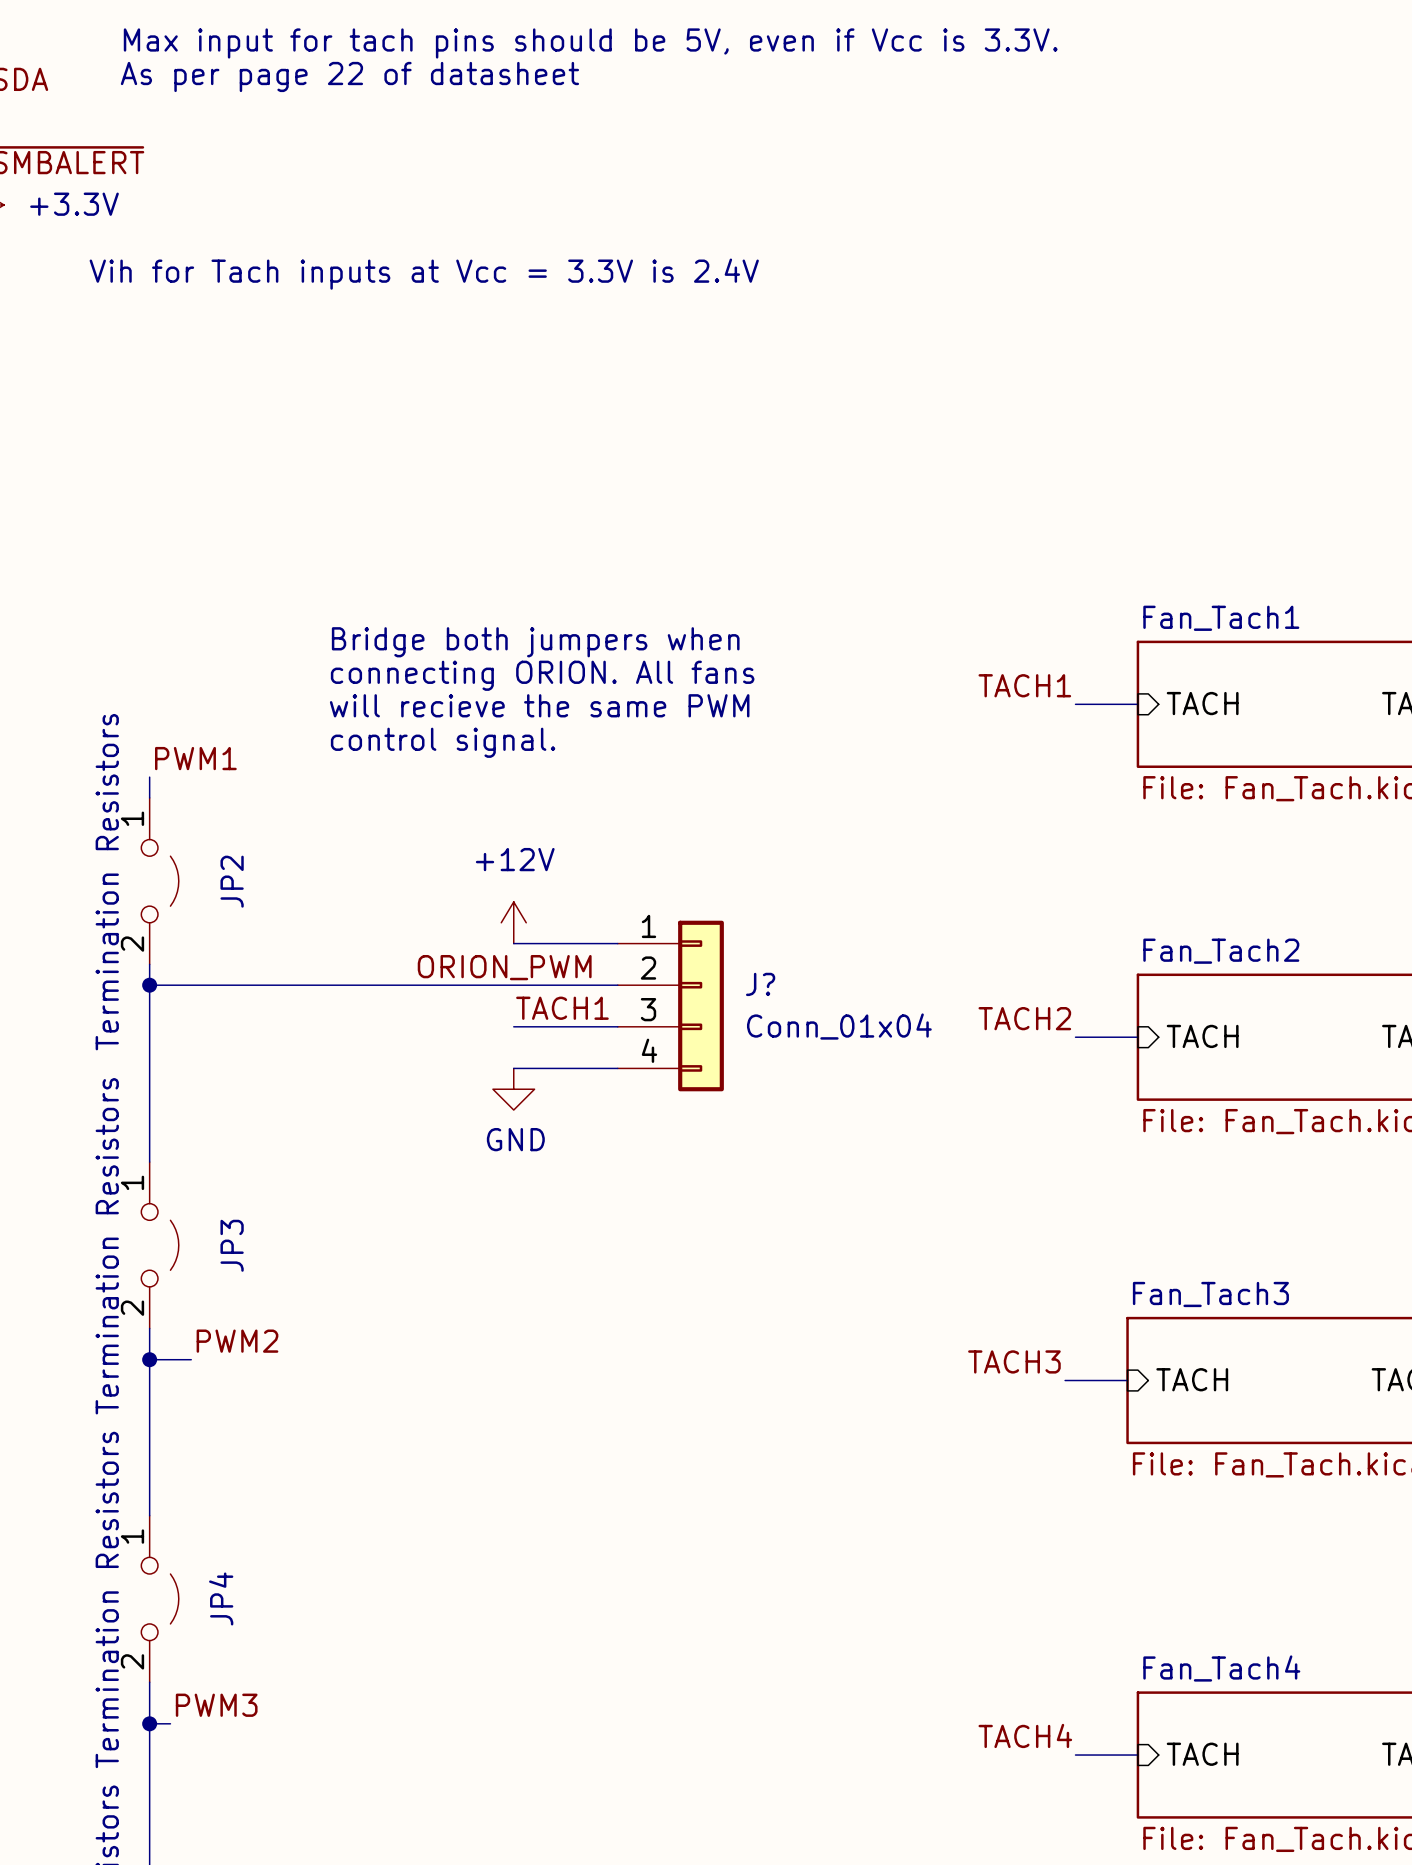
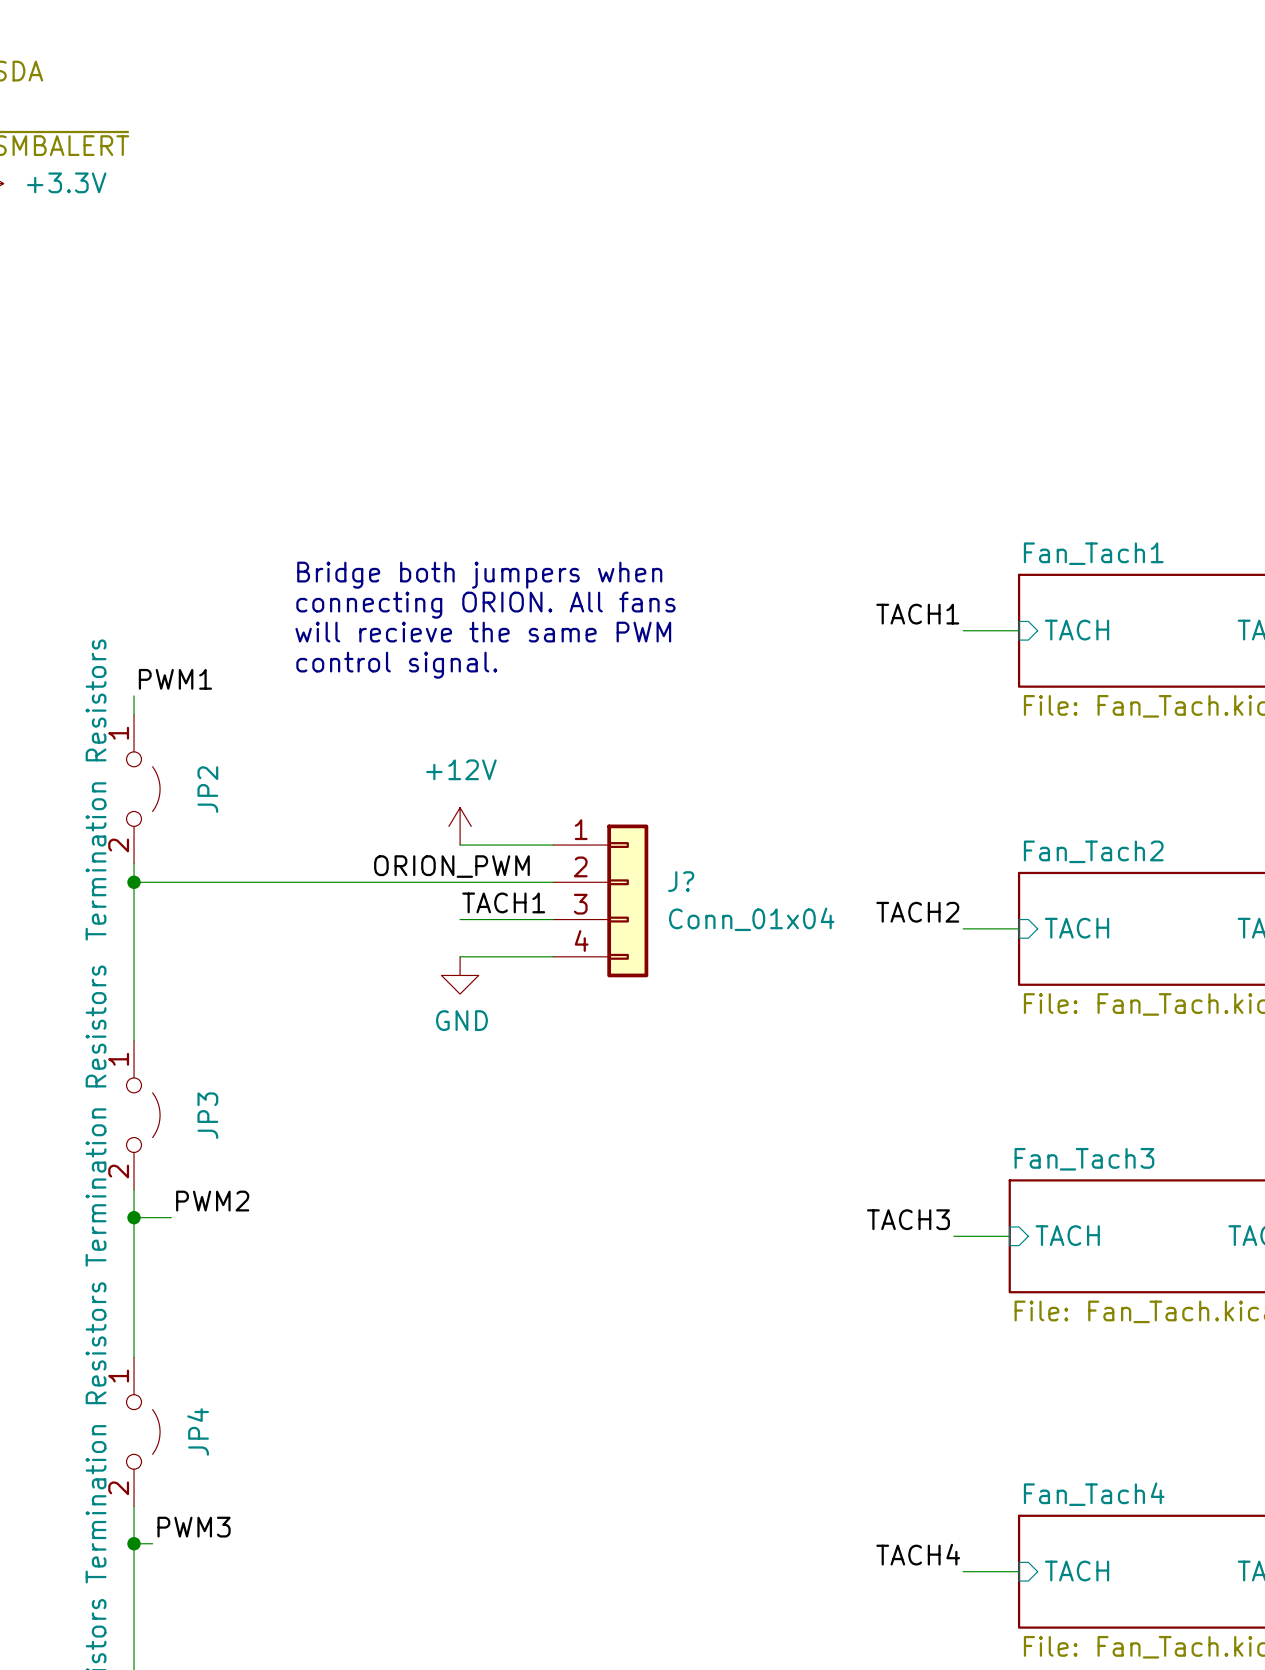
text: Max input for tach pins should be 5V, even if Vcc is 3.3V. (590, 43) -> none
text: As per page 22 of datasheet (349, 76) -> none
text: Vih for Tach inputs at Vcc = 3.3V is 2.4V (424, 274) -> none

